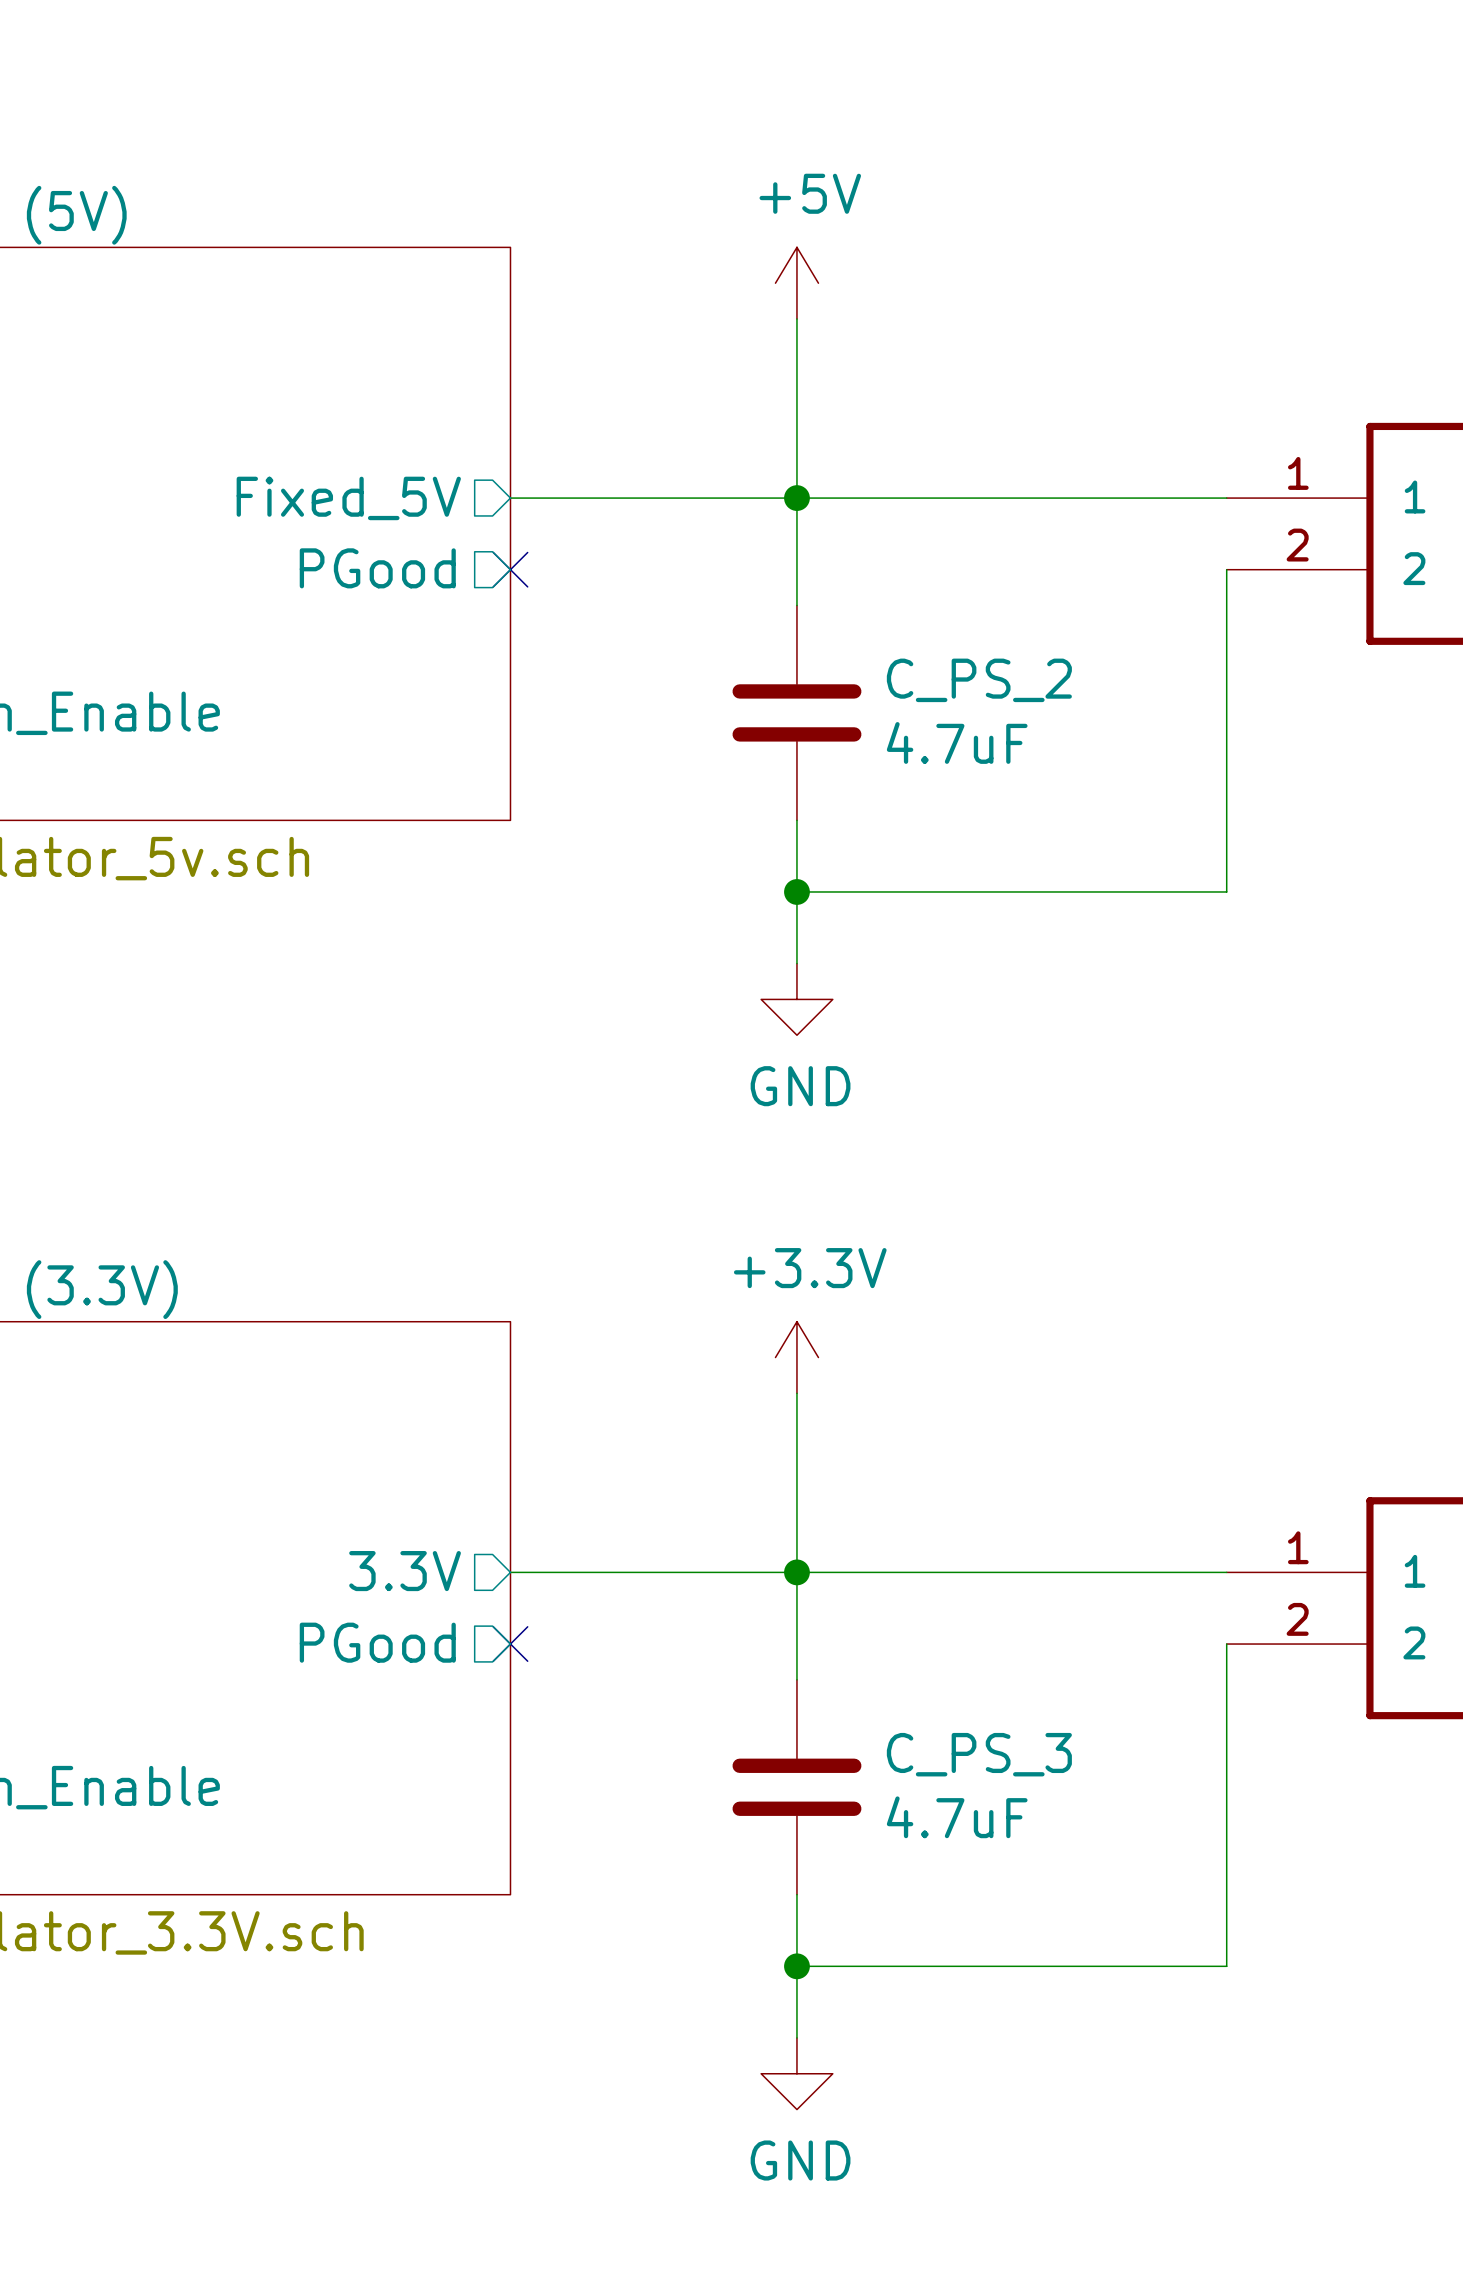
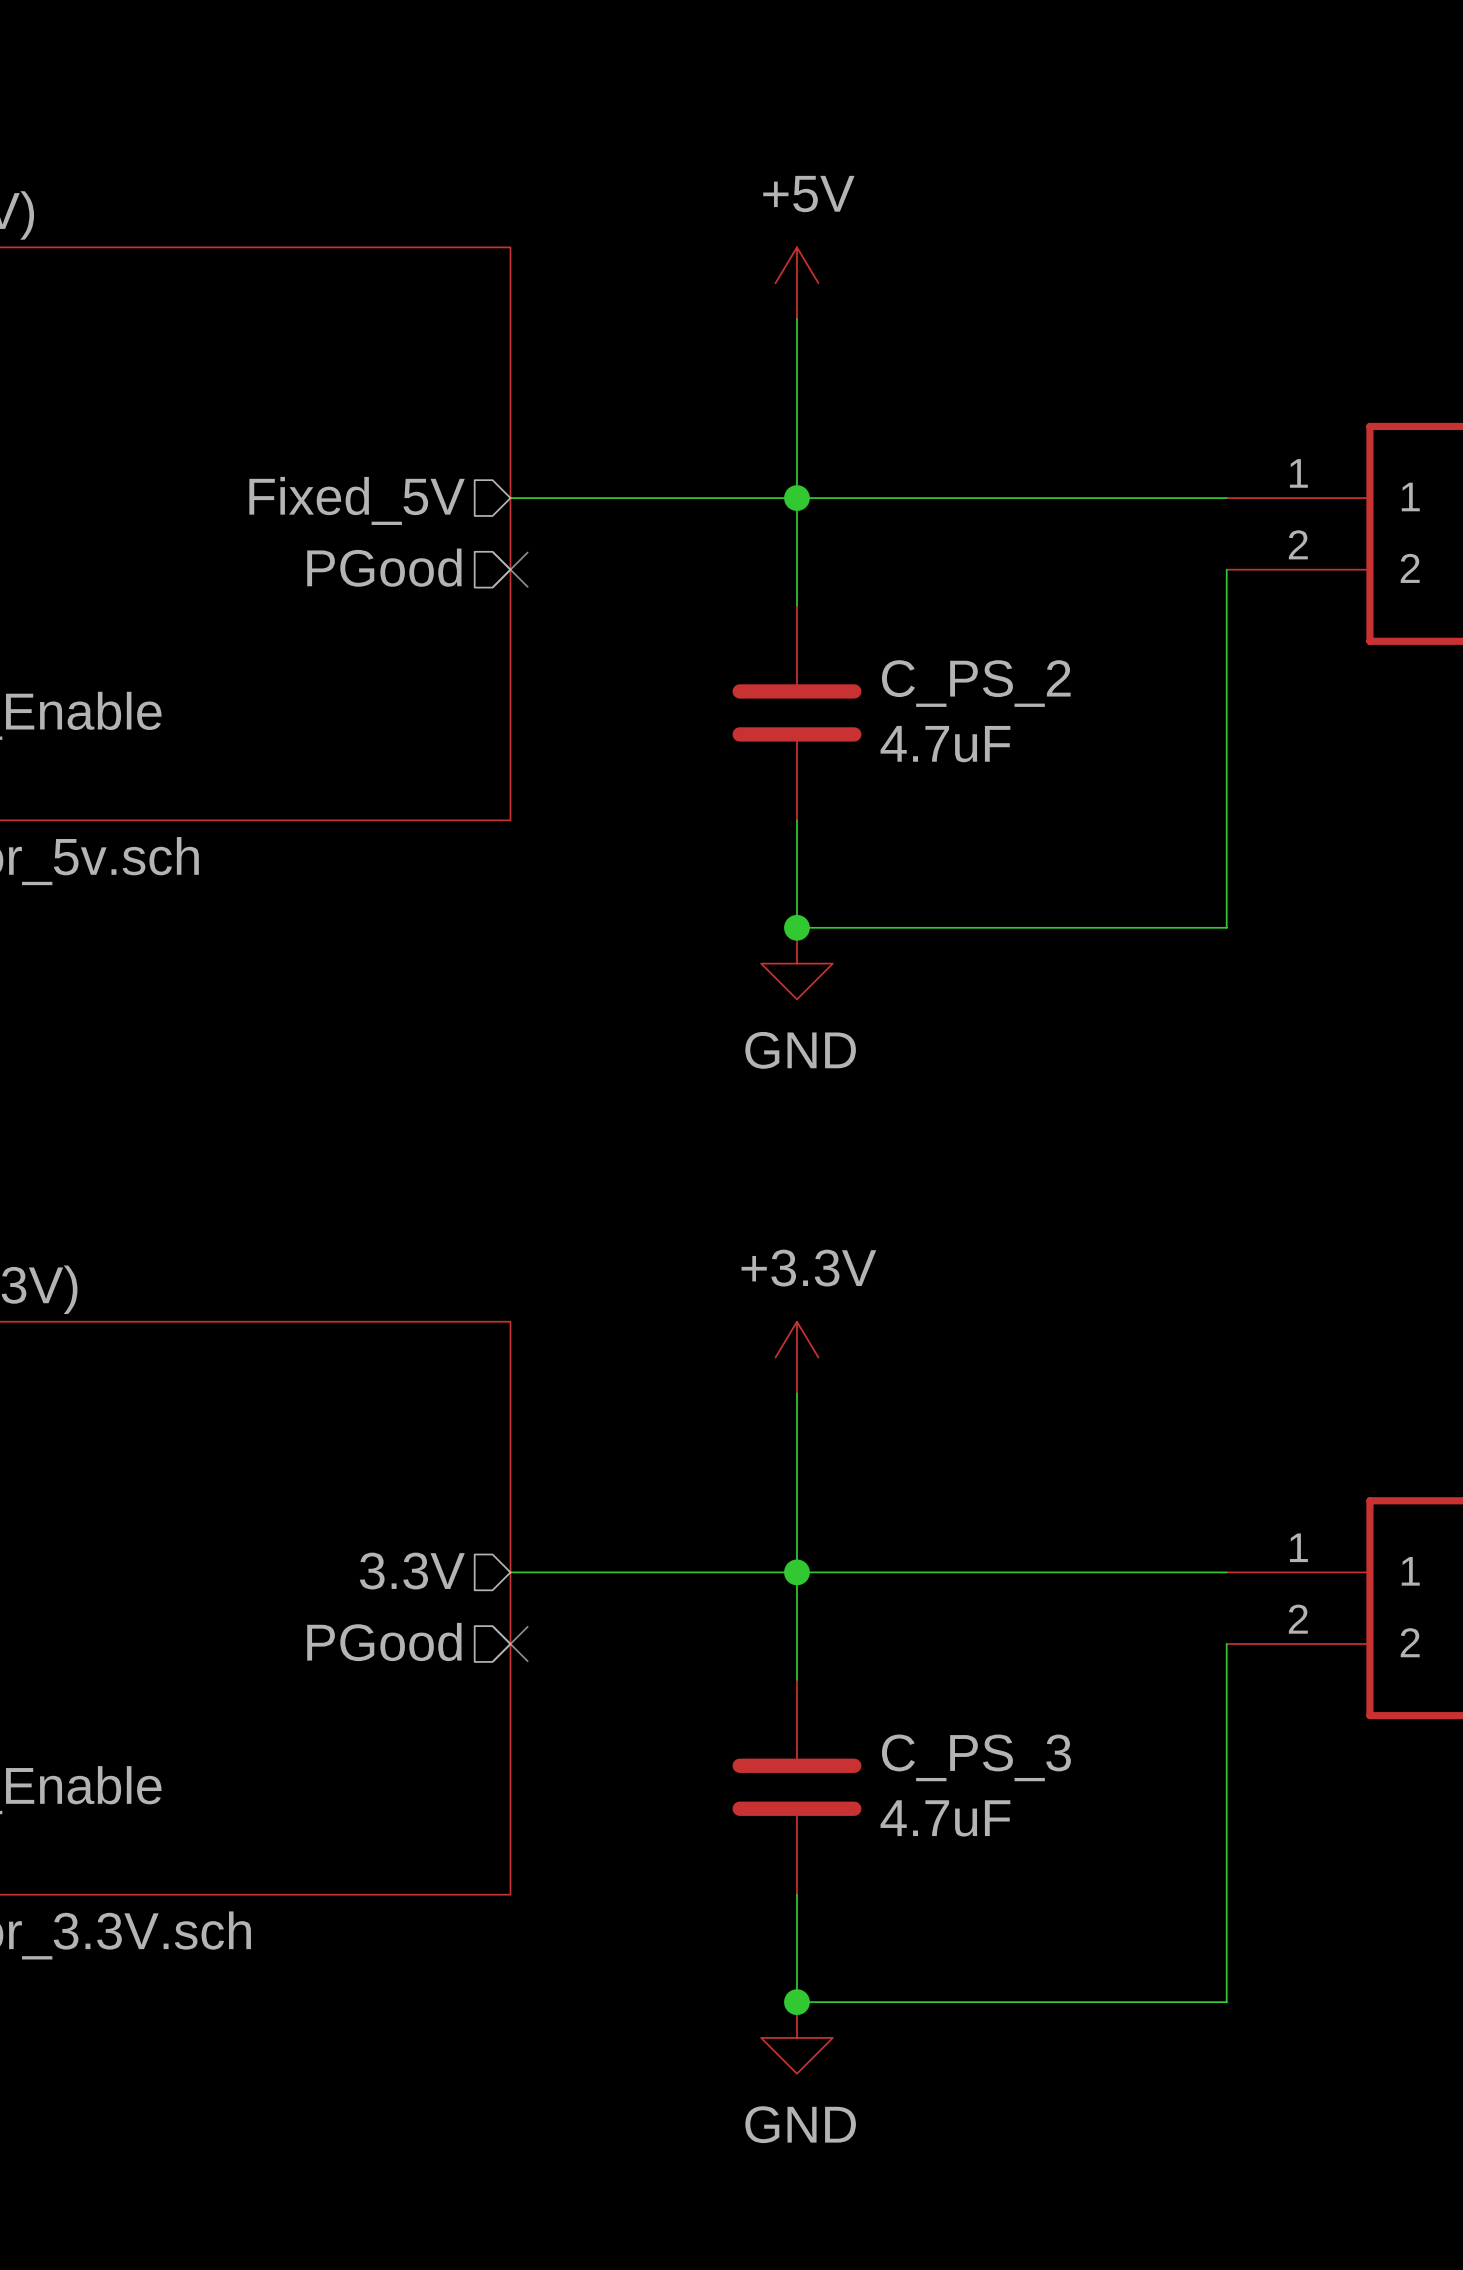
wire: (796, 891) (1226, 891) -> (796, 927) (1226, 927) (1226, 891)
junction position: (796, 891) -> (796, 927)
power symbol position: GND (796, 999) -> GND (796, 963)
wire: (796, 1966) (1226, 1966) -> (796, 2002) (1226, 2002) (1226, 1966)
junction position: (796, 1966) -> (796, 2002)
power symbol position: GND (796, 2073) -> GND (796, 2037)

